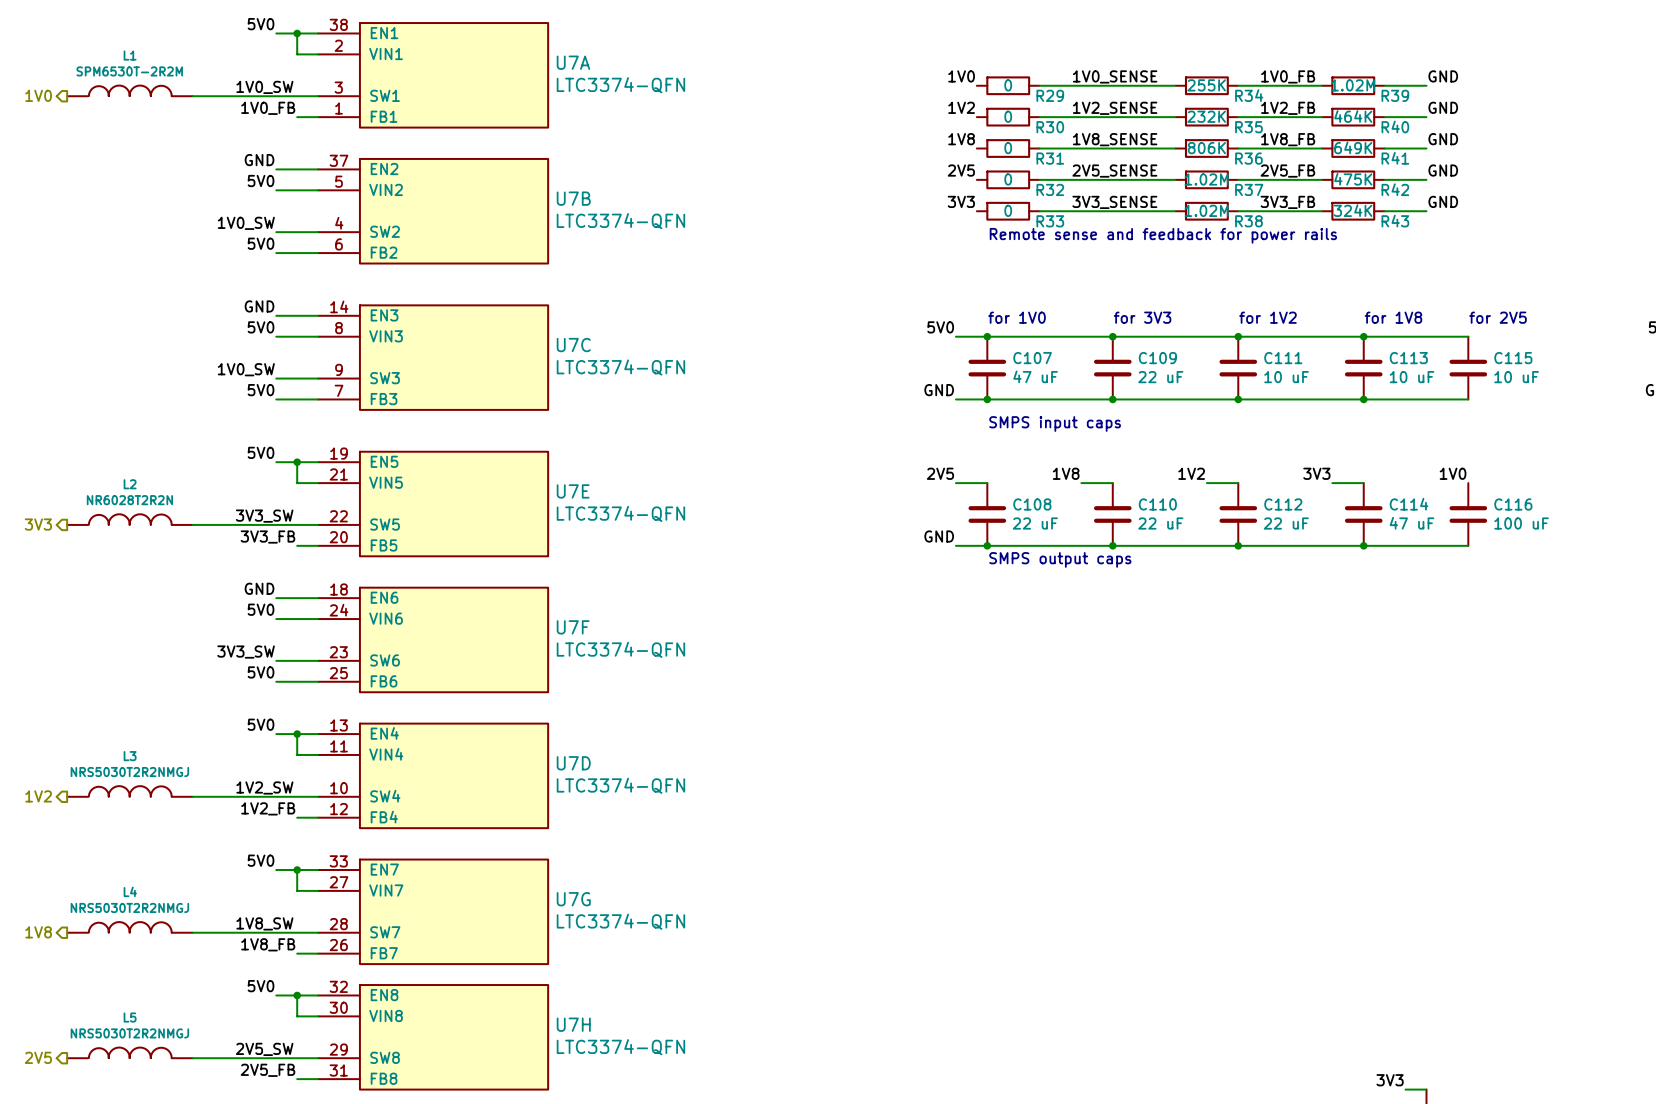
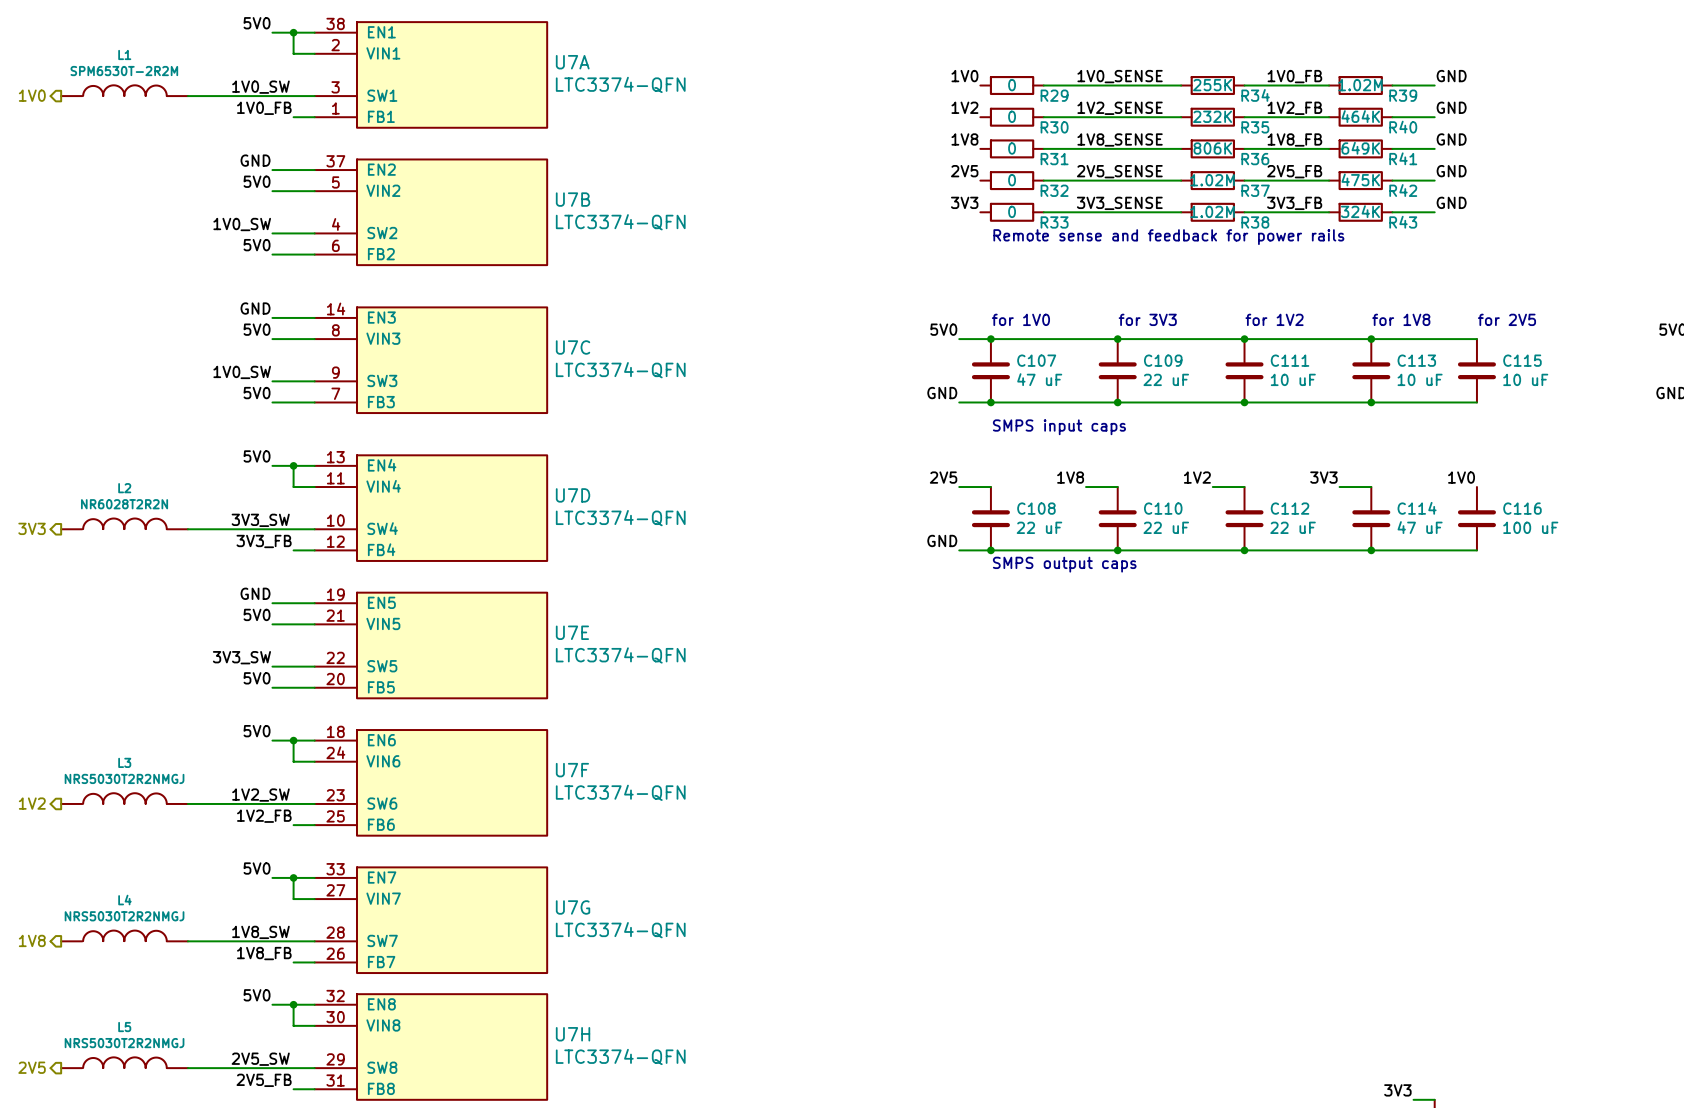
U7E position: (433, 504) -> (430, 645)
U7F position: (433, 639) -> (430, 782)
U7D position: (433, 775) -> (430, 508)

